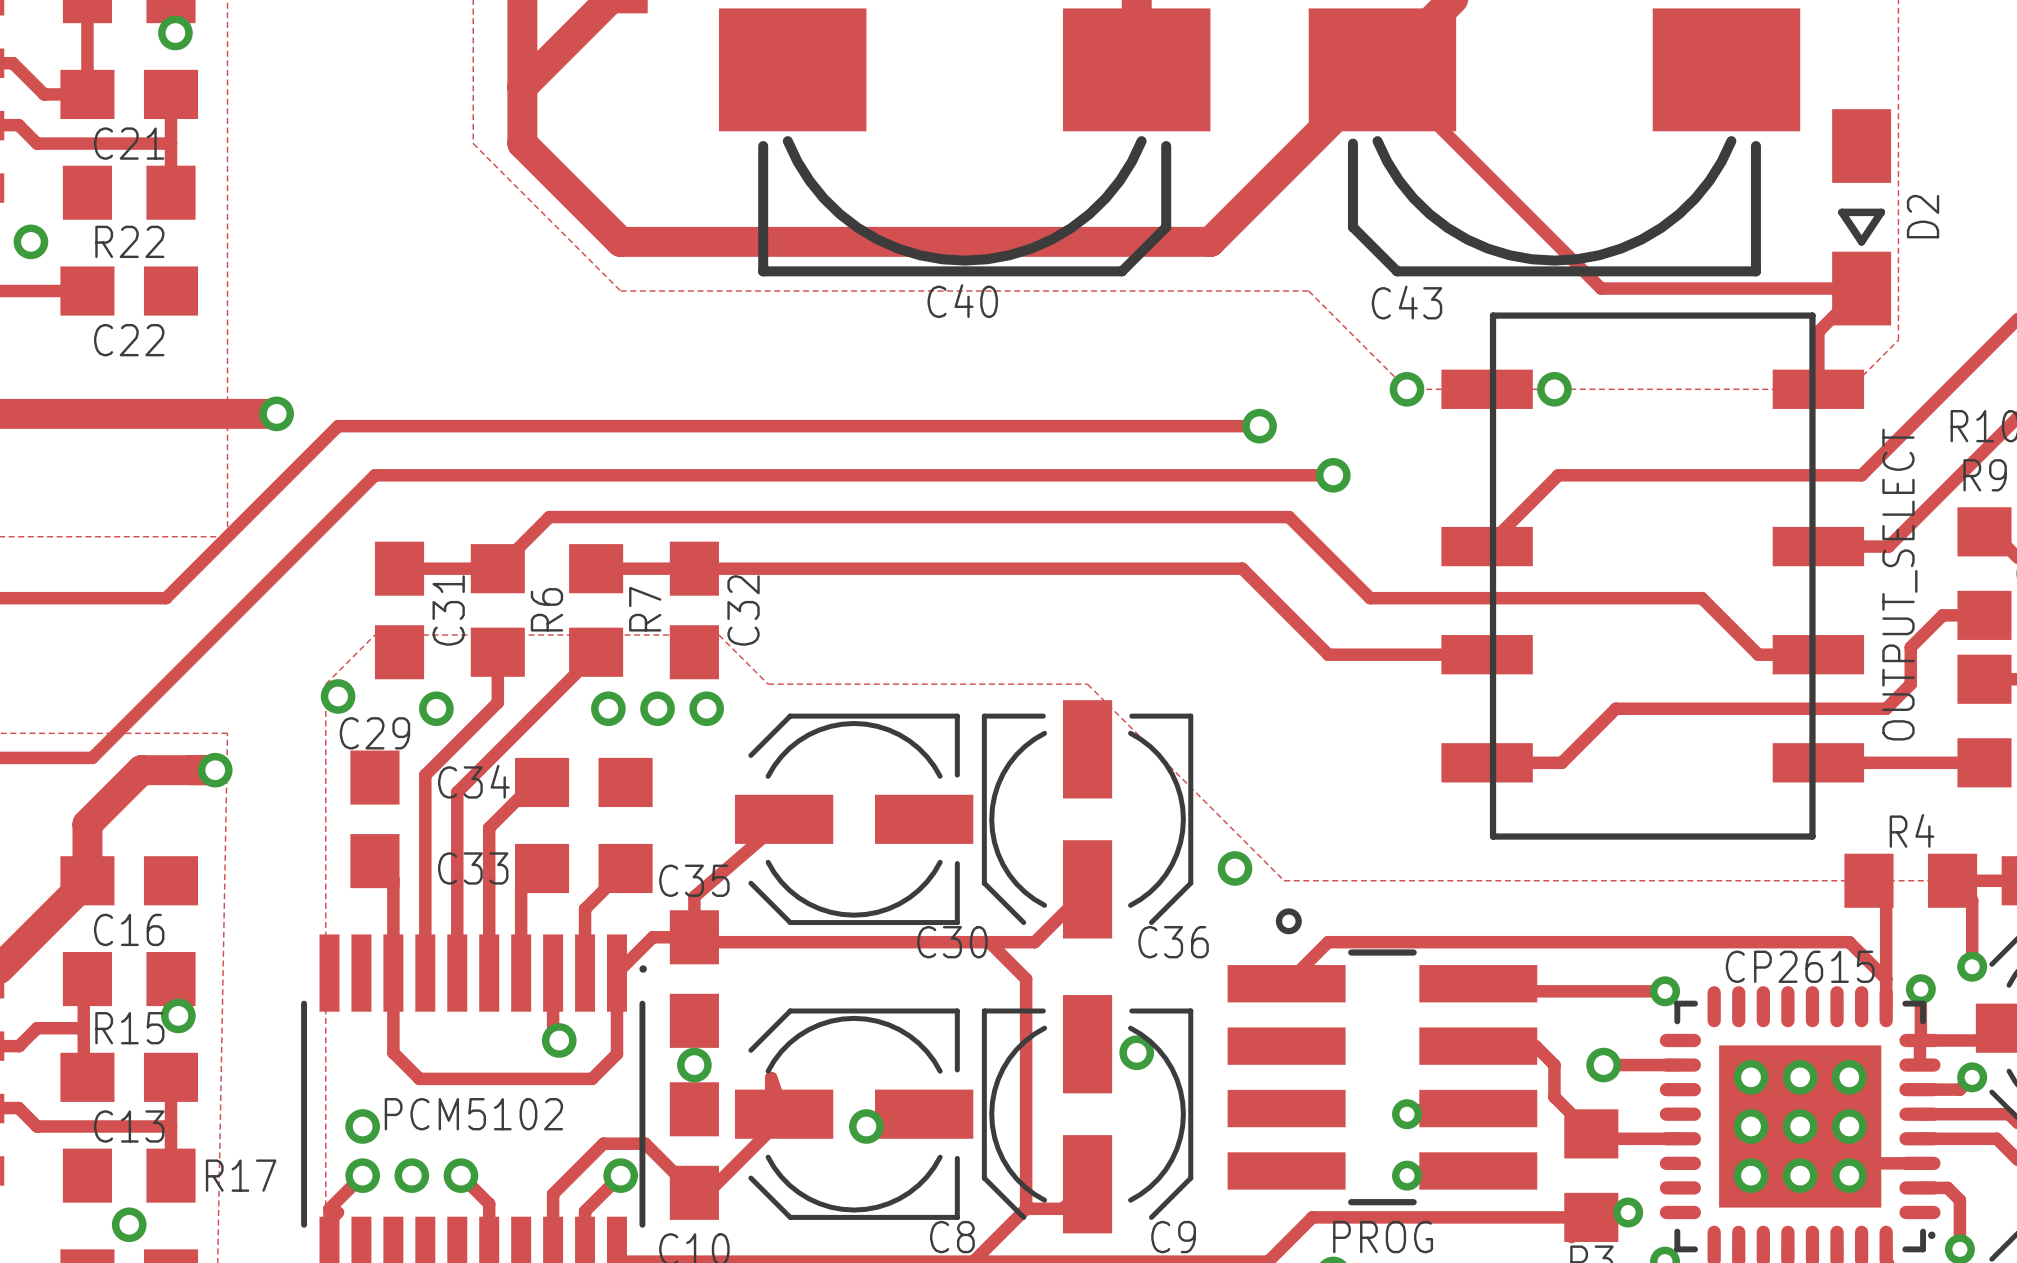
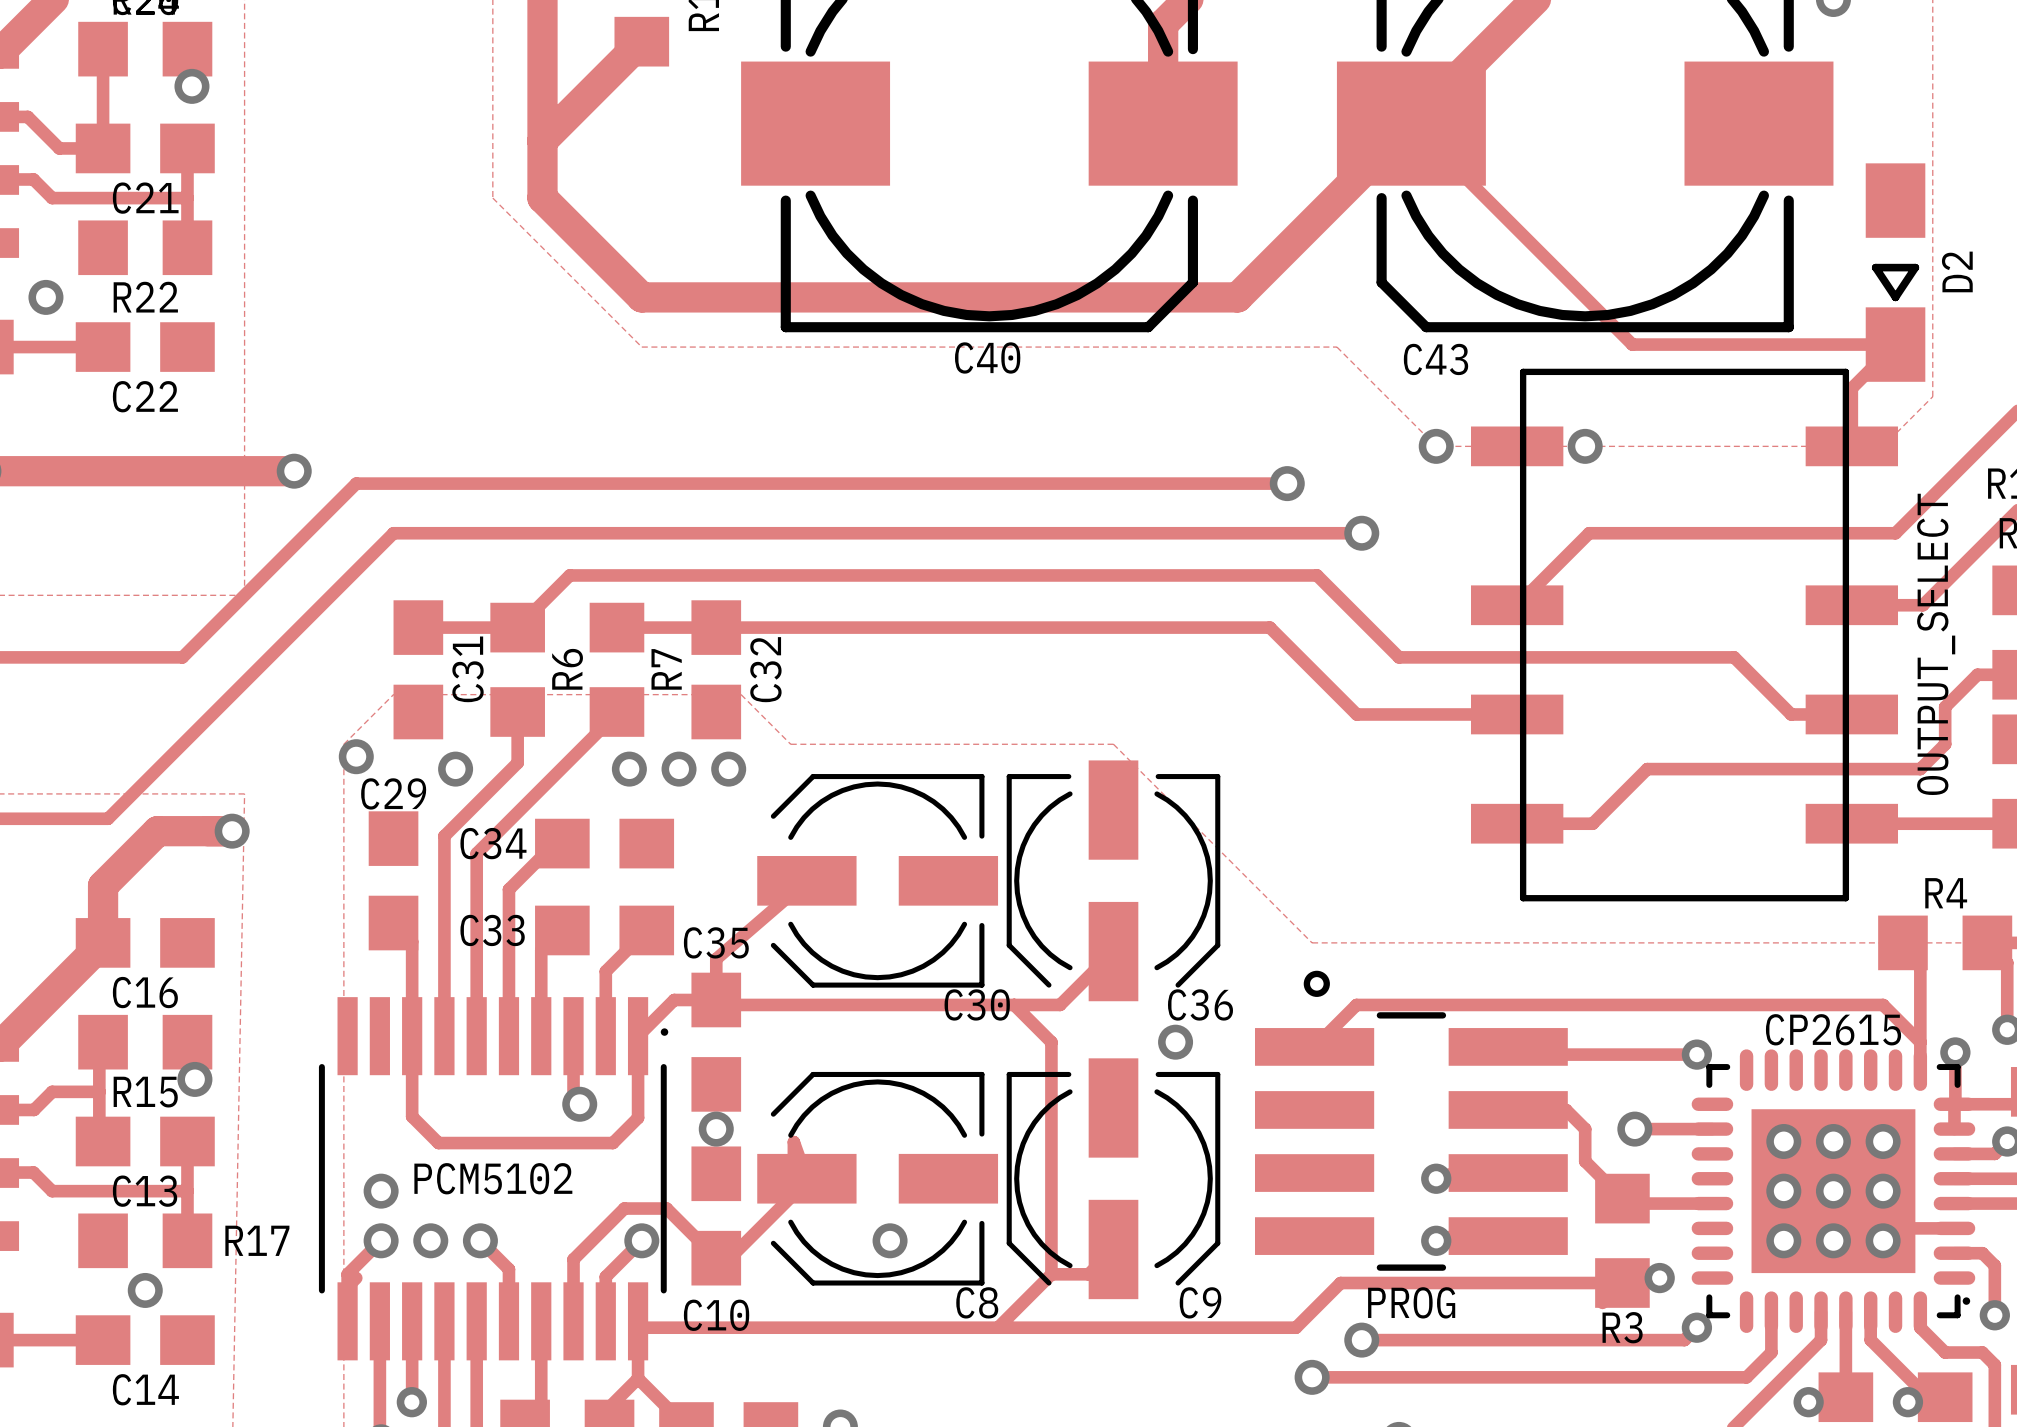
via: (1235, 868) -> none
via: none -> (1175, 1042)
via: (1136, 1052) -> none
via position: (866, 1126) -> (890, 1240)

